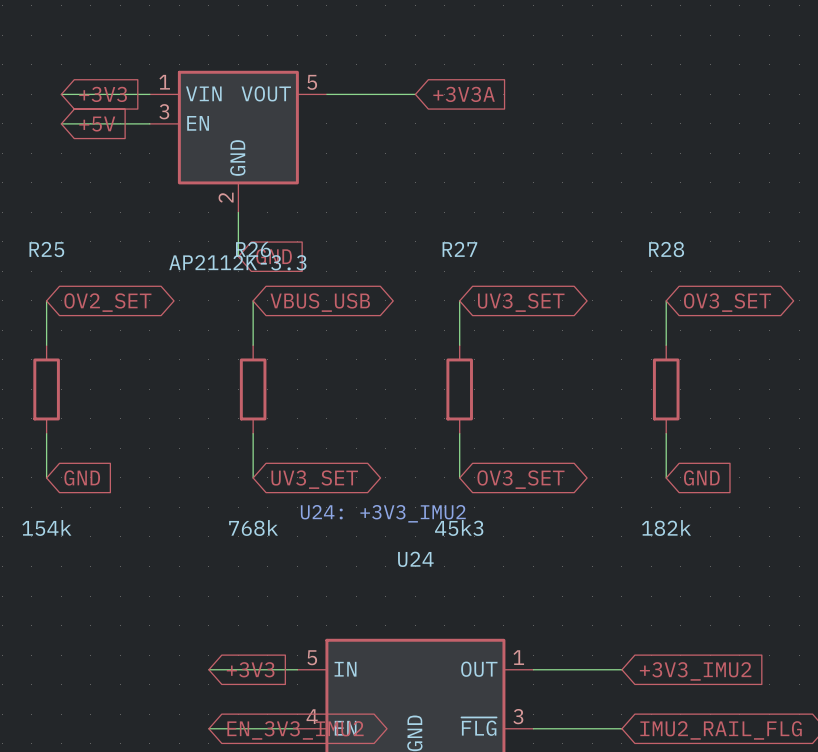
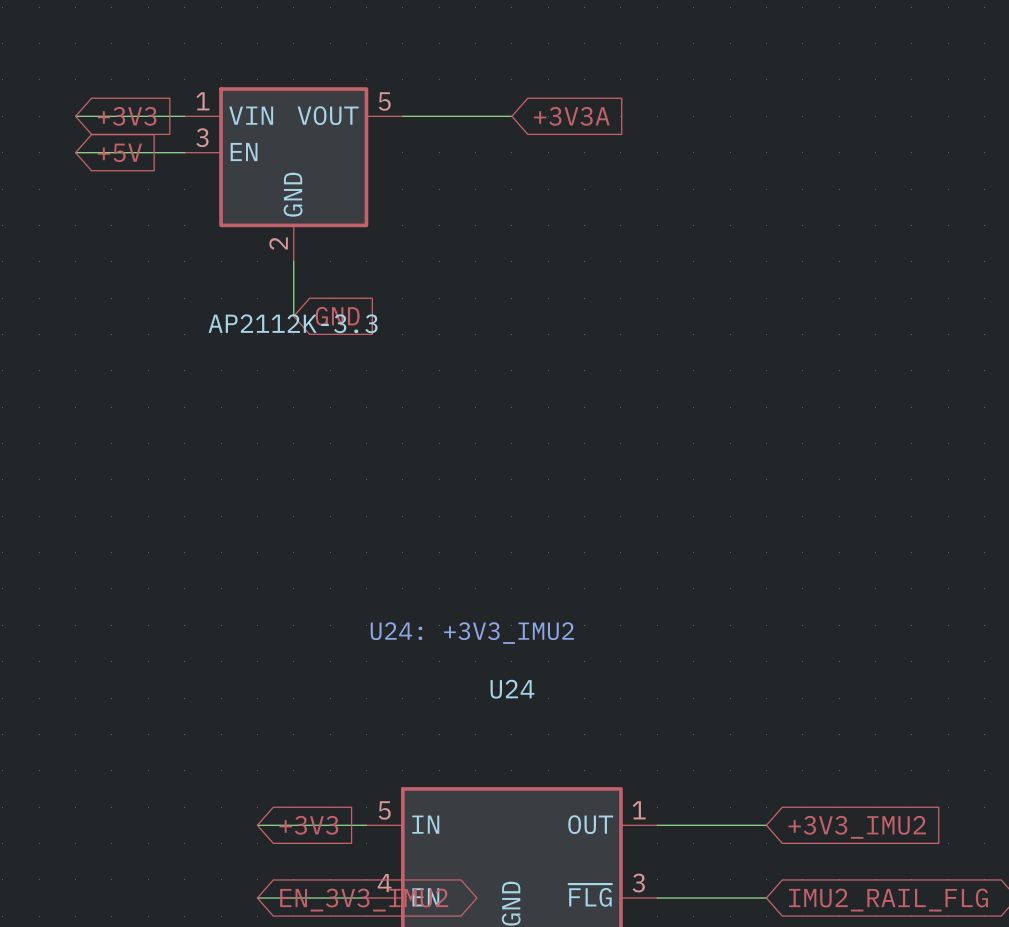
wire: (46, 300) (46, 345) -> none
wire: (253, 300) (253, 345) -> none
wire: (459, 300) (459, 345) -> none
wire: (666, 300) (666, 345) -> none
global label: OV2_SET (107, 302) -> none
global label: VBUS_USB (320, 302) -> none
global label: UV3_SET (521, 302) -> none
global label: OV3_SET (727, 302) -> none
R25: 154k (46, 389) -> none
R26: 768k (253, 389) -> none
R27: 45k3 (459, 389) -> none
R28: 182k (666, 389) -> none
wire: (46, 433) (46, 477) -> none
wire: (253, 433) (253, 477) -> none
wire: (459, 433) (459, 477) -> none
wire: (666, 433) (666, 477) -> none
global label: GND (82, 477) -> none
global label: GND (701, 477) -> none
global label: UV3_SET (314, 479) -> none
global label: OV3_SET (520, 479) -> none

